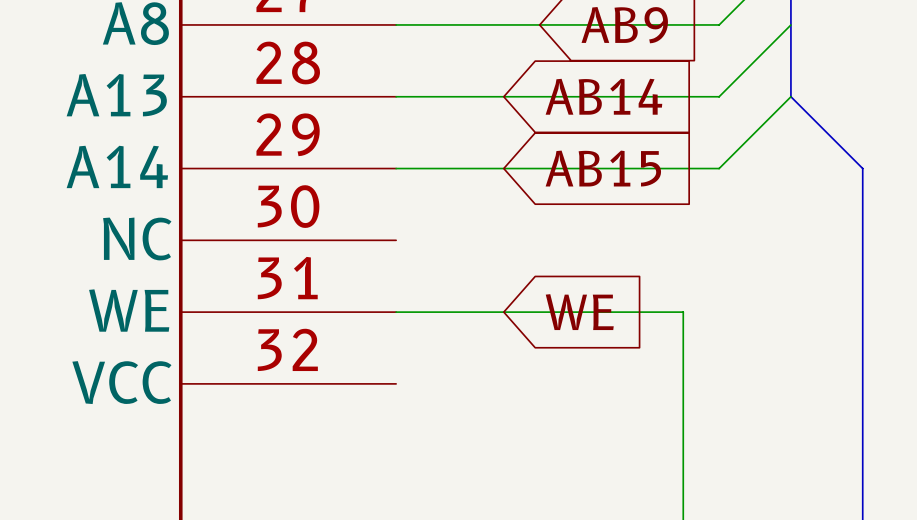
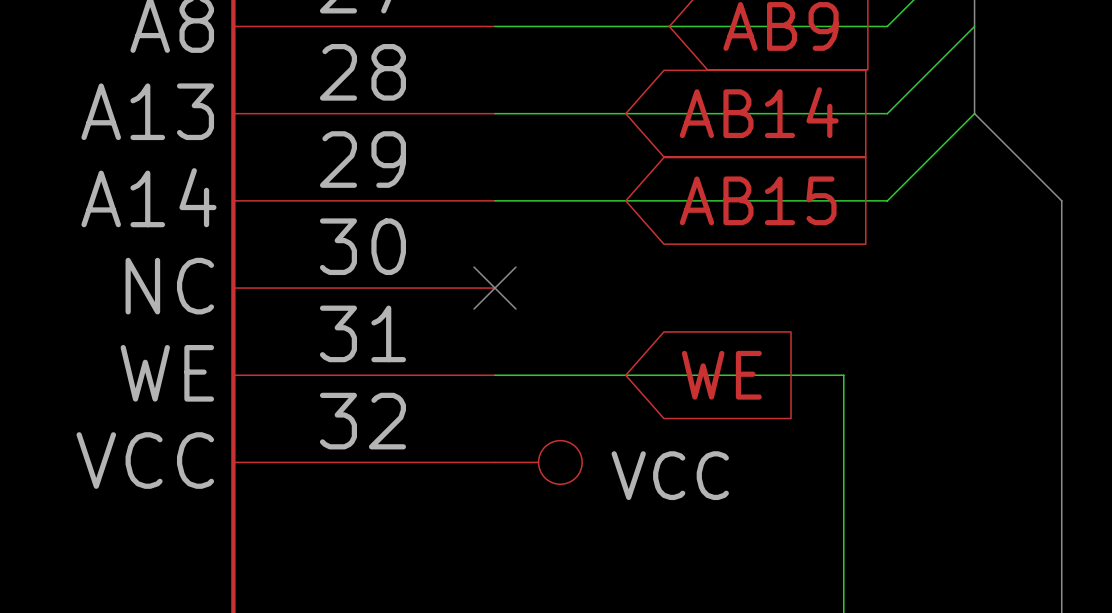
no-connect mark: none -> (494, 288)
power symbol: none -> VCC (538, 462)

